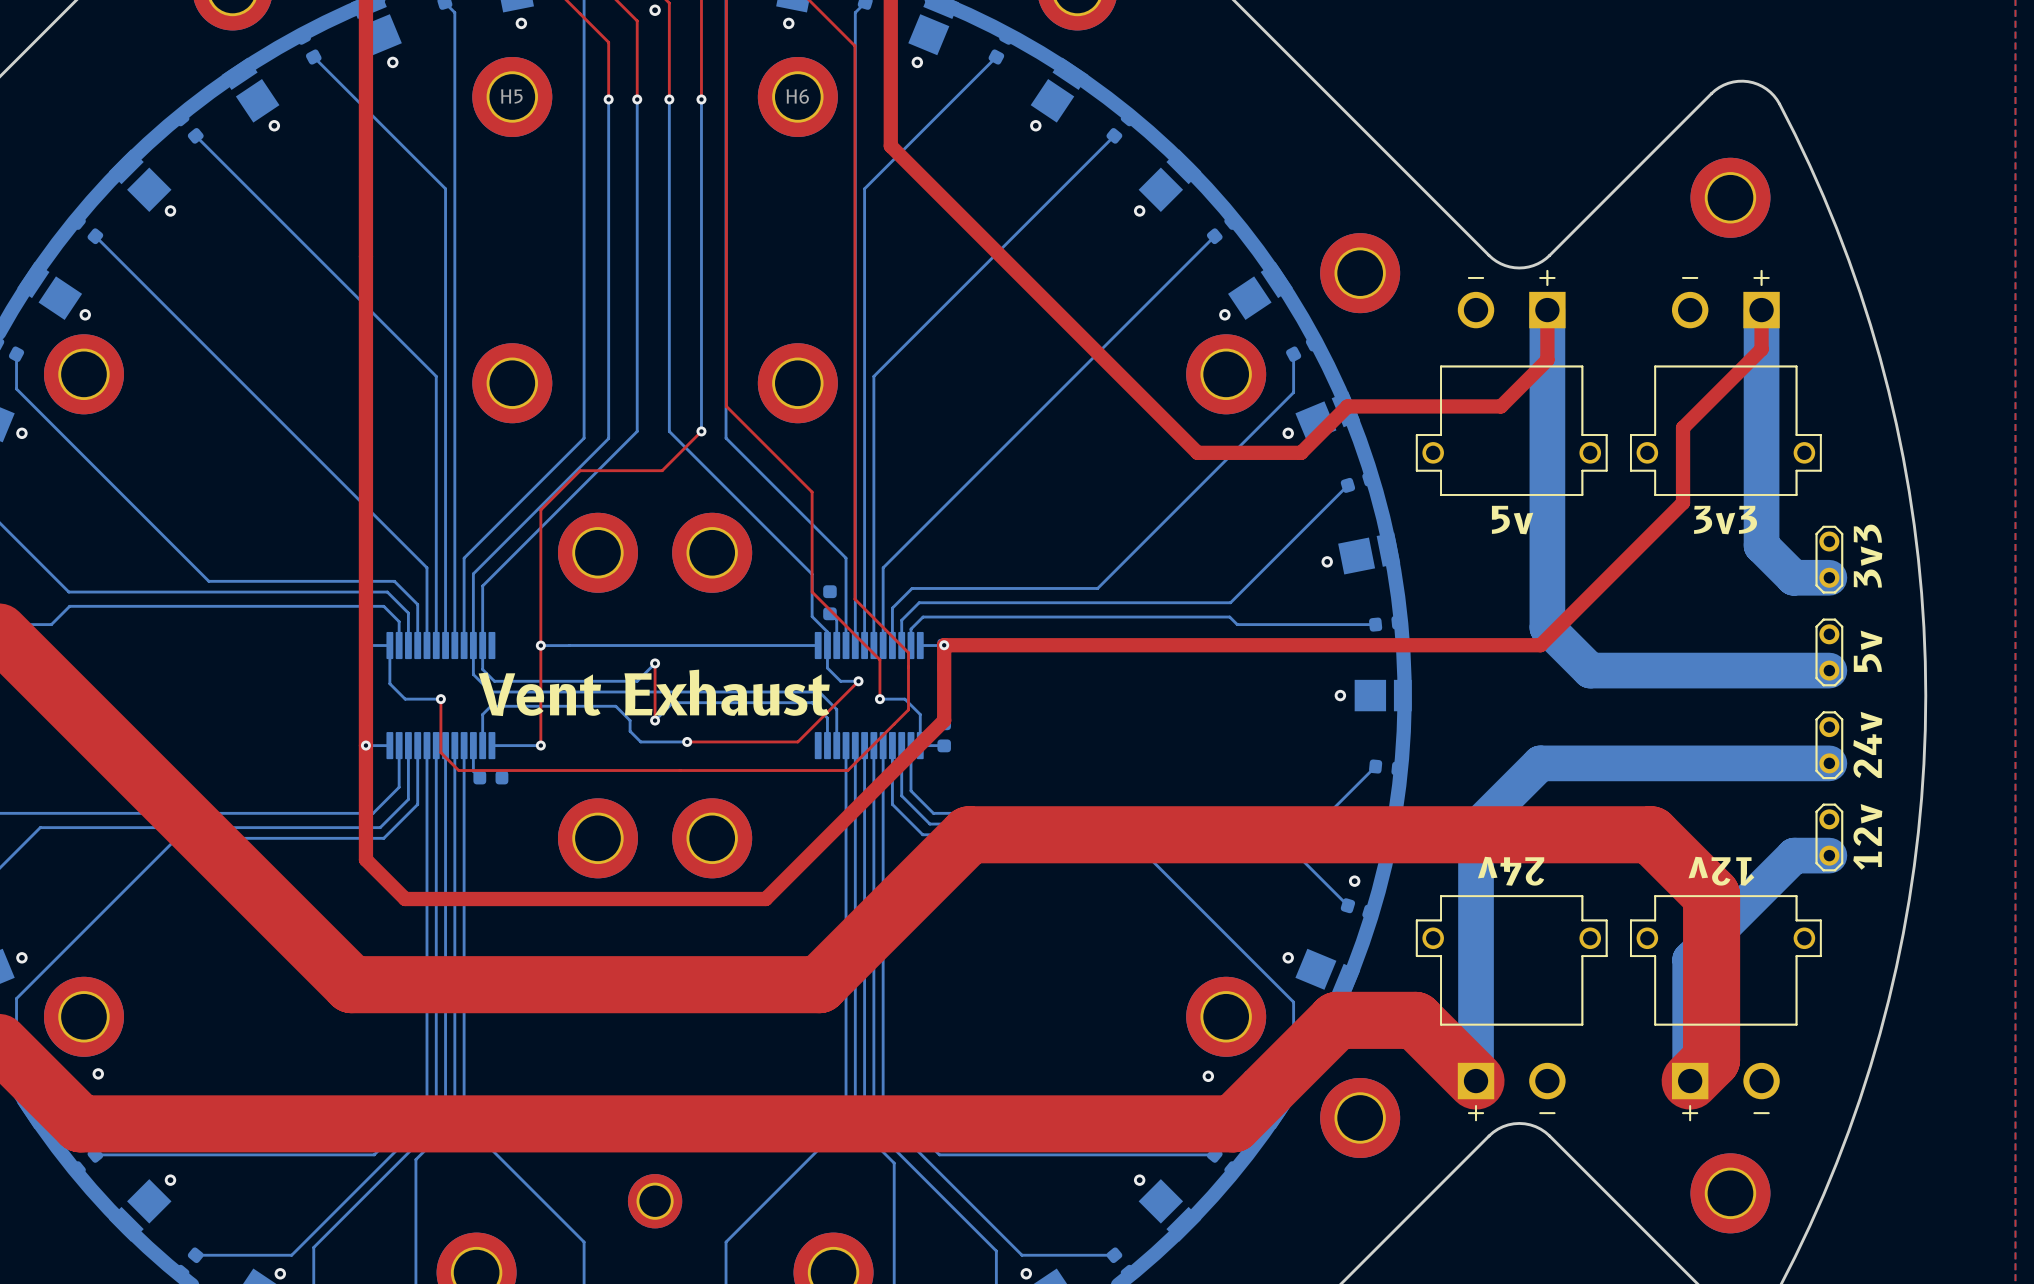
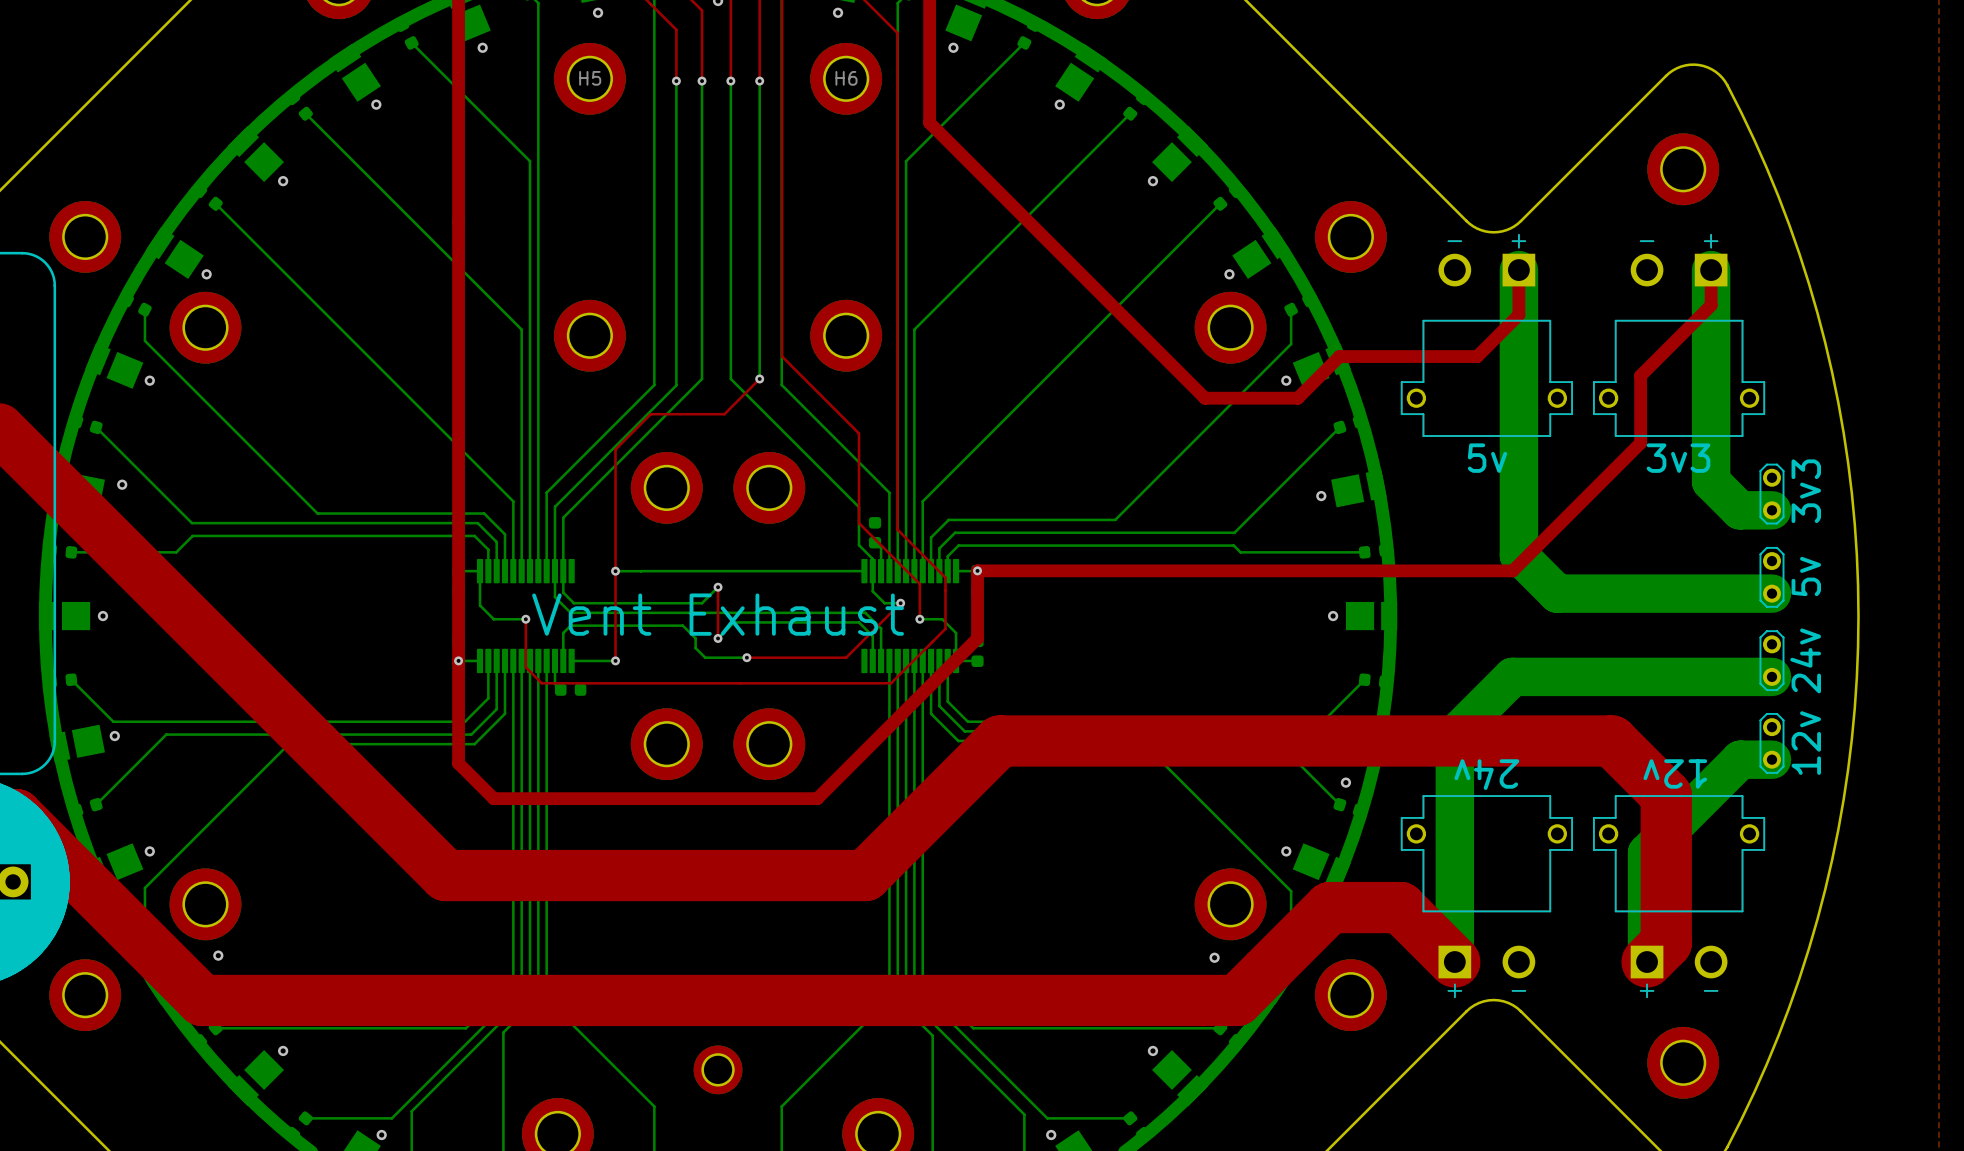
bottom track width: thin (1547, 310) (1547, 627) (1590, 670) (1829, 670) -> thick (1518, 270) (1518, 555) (1557, 593) (1771, 593)
bottom track width: thin (1761, 310) (1761, 545) (1793, 577) (1829, 577) -> thick (1711, 270) (1711, 481) (1739, 510) (1771, 510)
bottom track width: thin (1829, 763) (1540, 763) (1476, 827) (1476, 1081) -> thick (1771, 676) (1512, 676) (1454, 734) (1454, 962)
bottom track width: thin (1829, 855) (1794, 855) (1690, 959) (1690, 1081) -> thick (1771, 759) (1740, 759) (1647, 853) (1647, 962)

